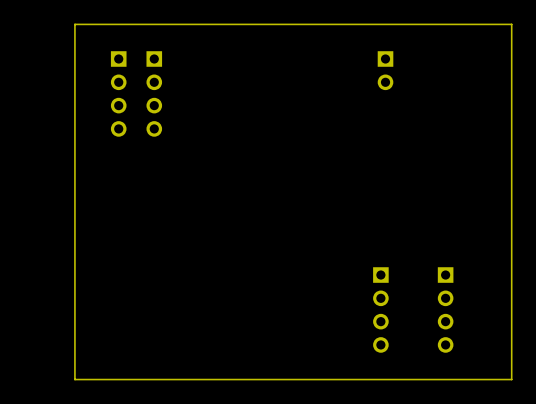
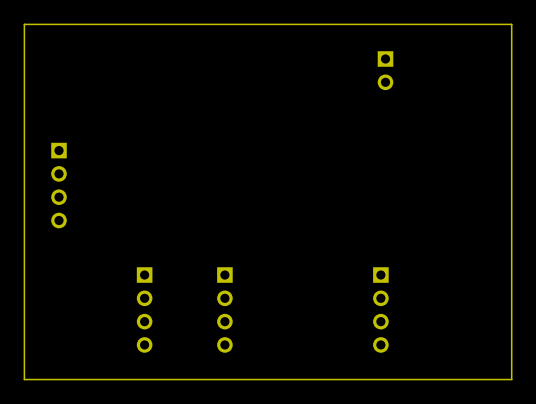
board edge: (74, 24) (74, 379) -> (74, 24) (24, 24) (24, 379) (74, 379)
part: (118, 93) -> none
part: (154, 93) -> none
part: none -> (58, 185)
part: none -> (144, 309)
part: none -> (224, 309)
part: (445, 309) -> none

